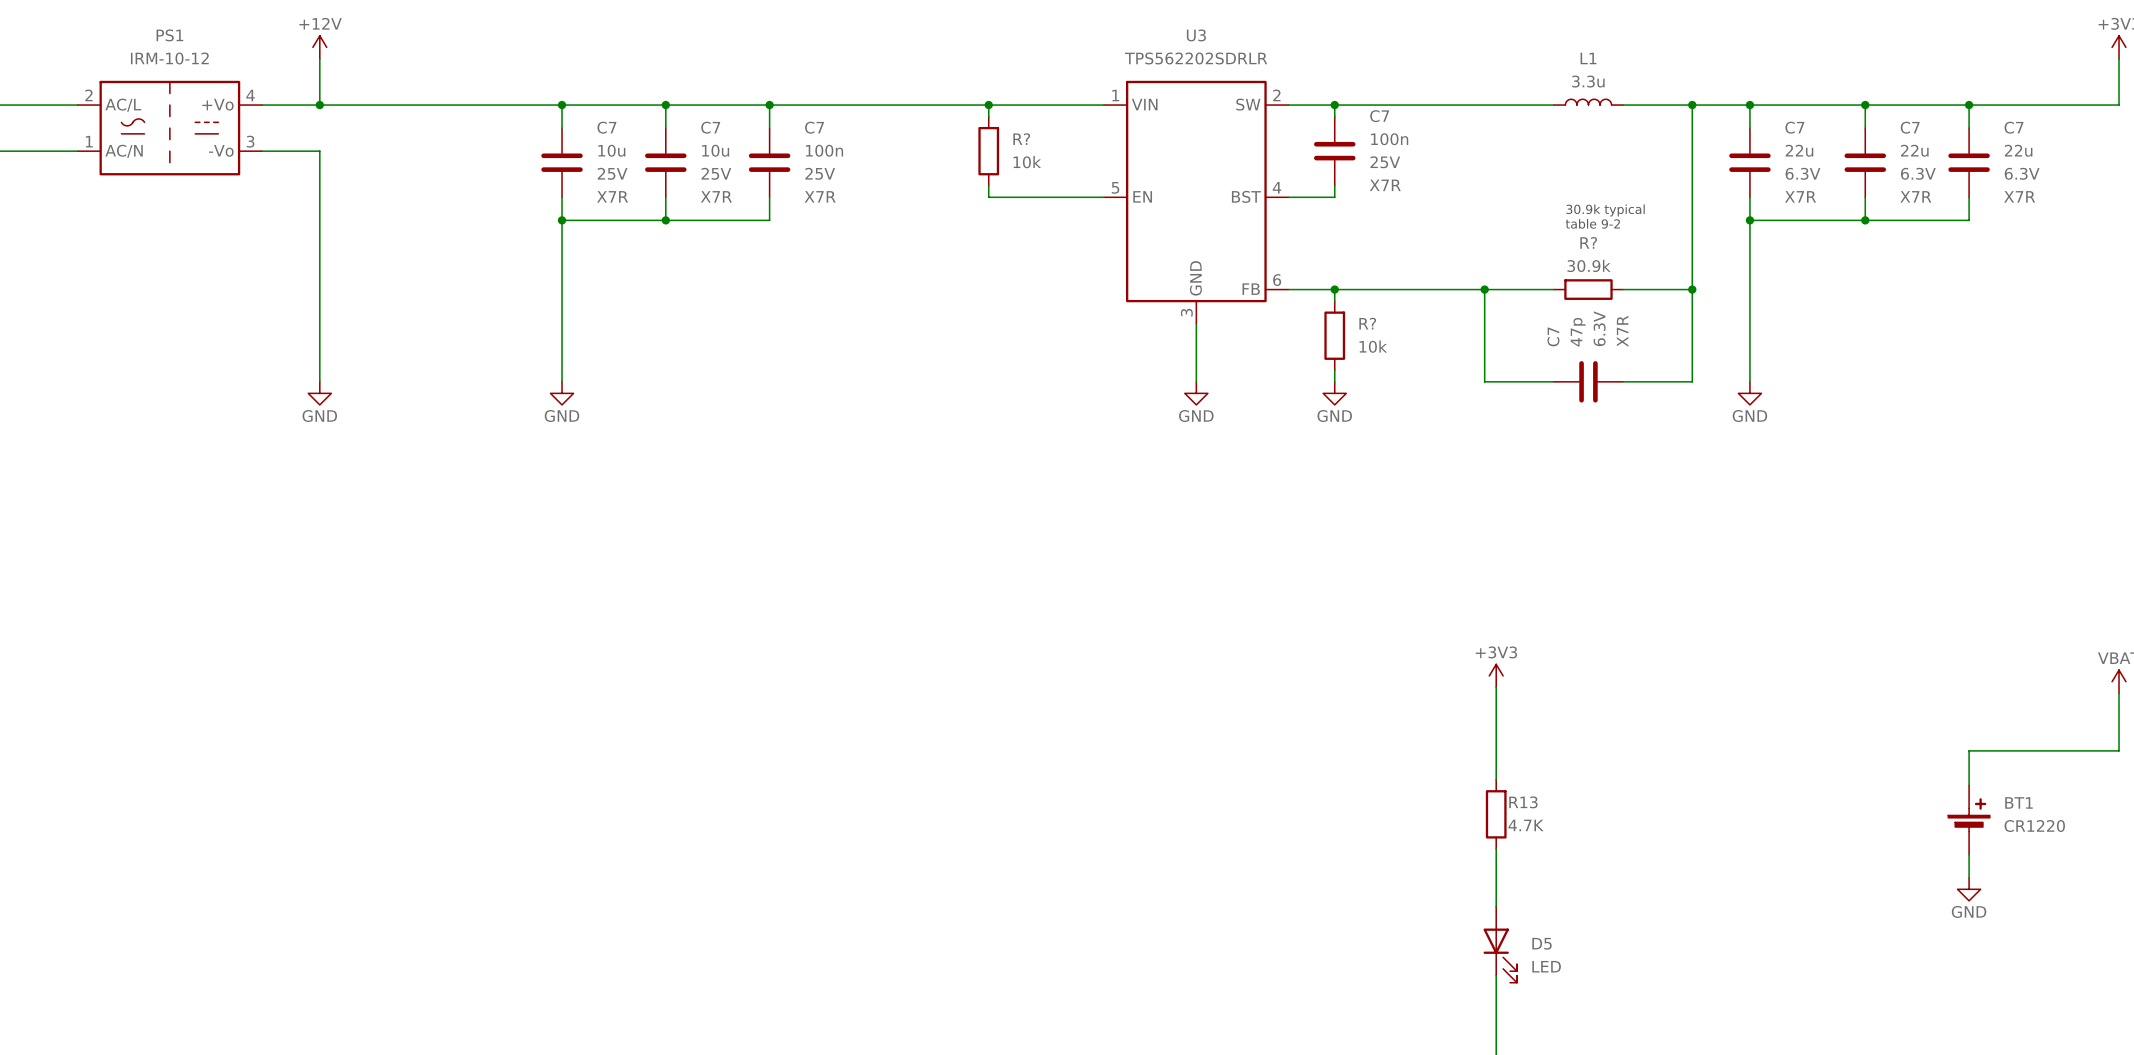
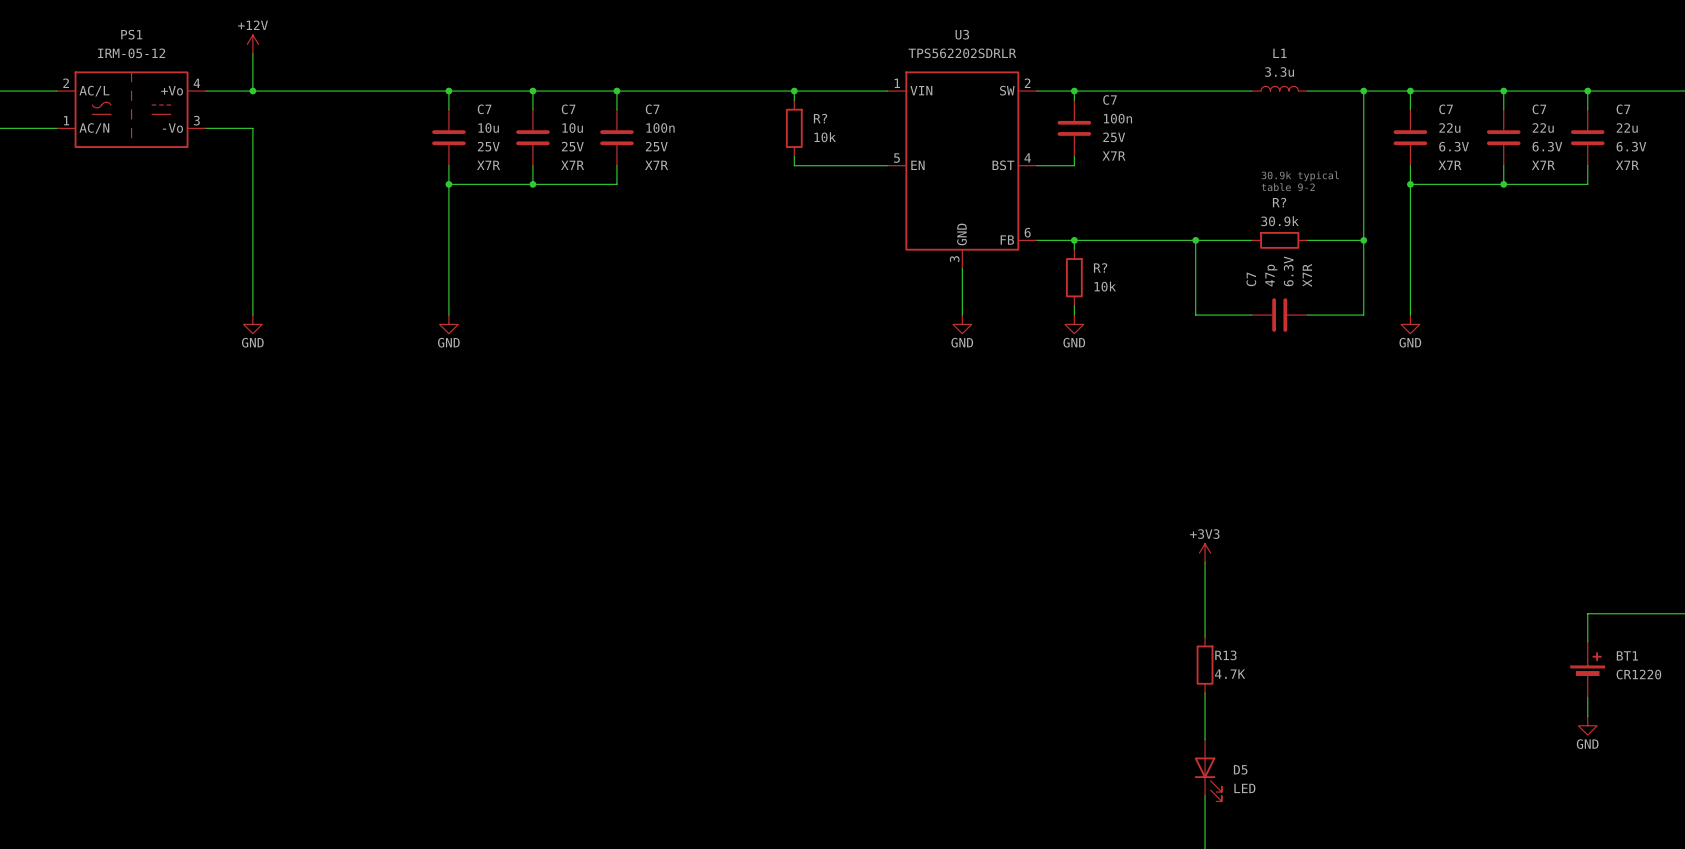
PS1 value: IRM-10-12 (169, 58) -> IRM-05-12 (131, 53)

